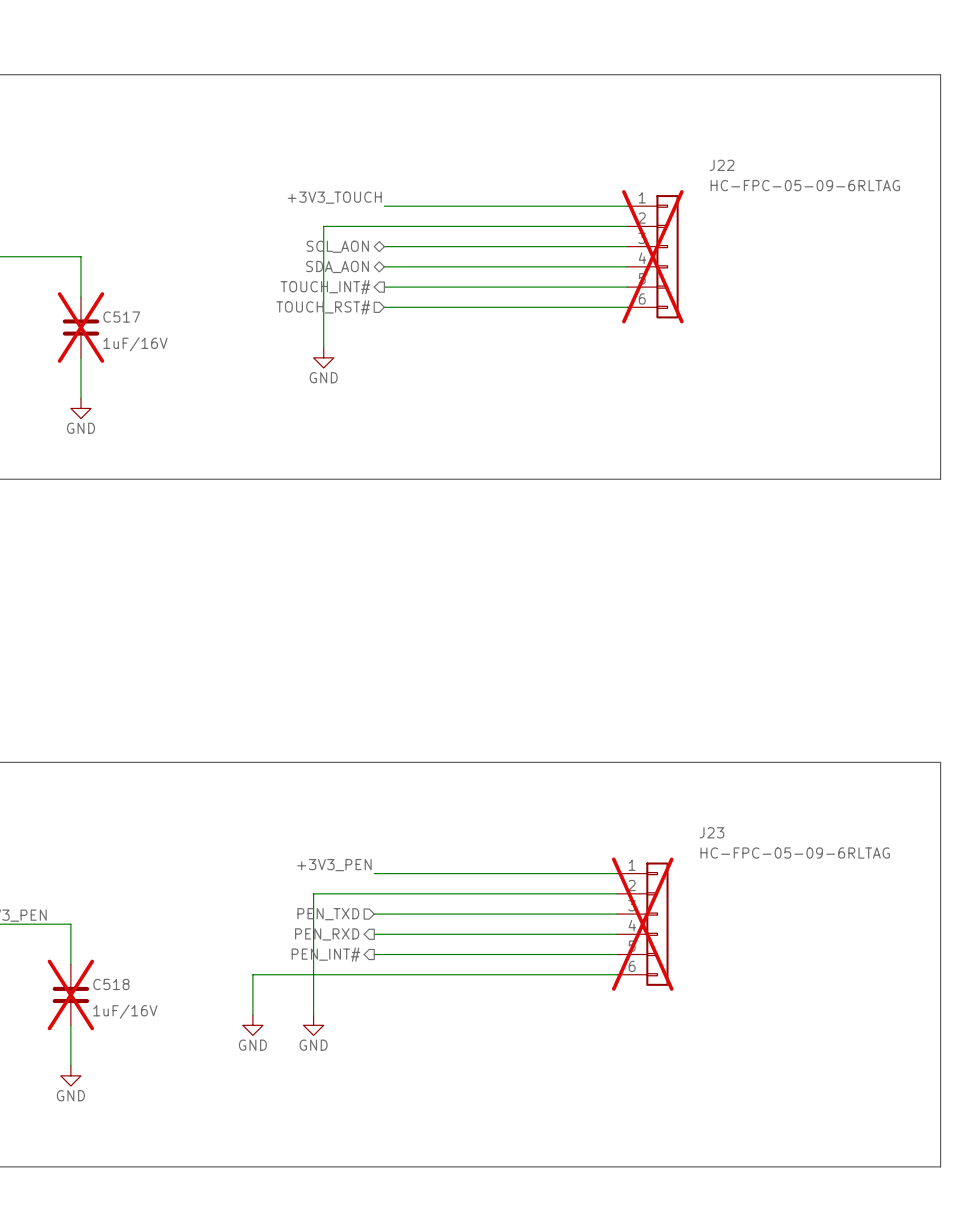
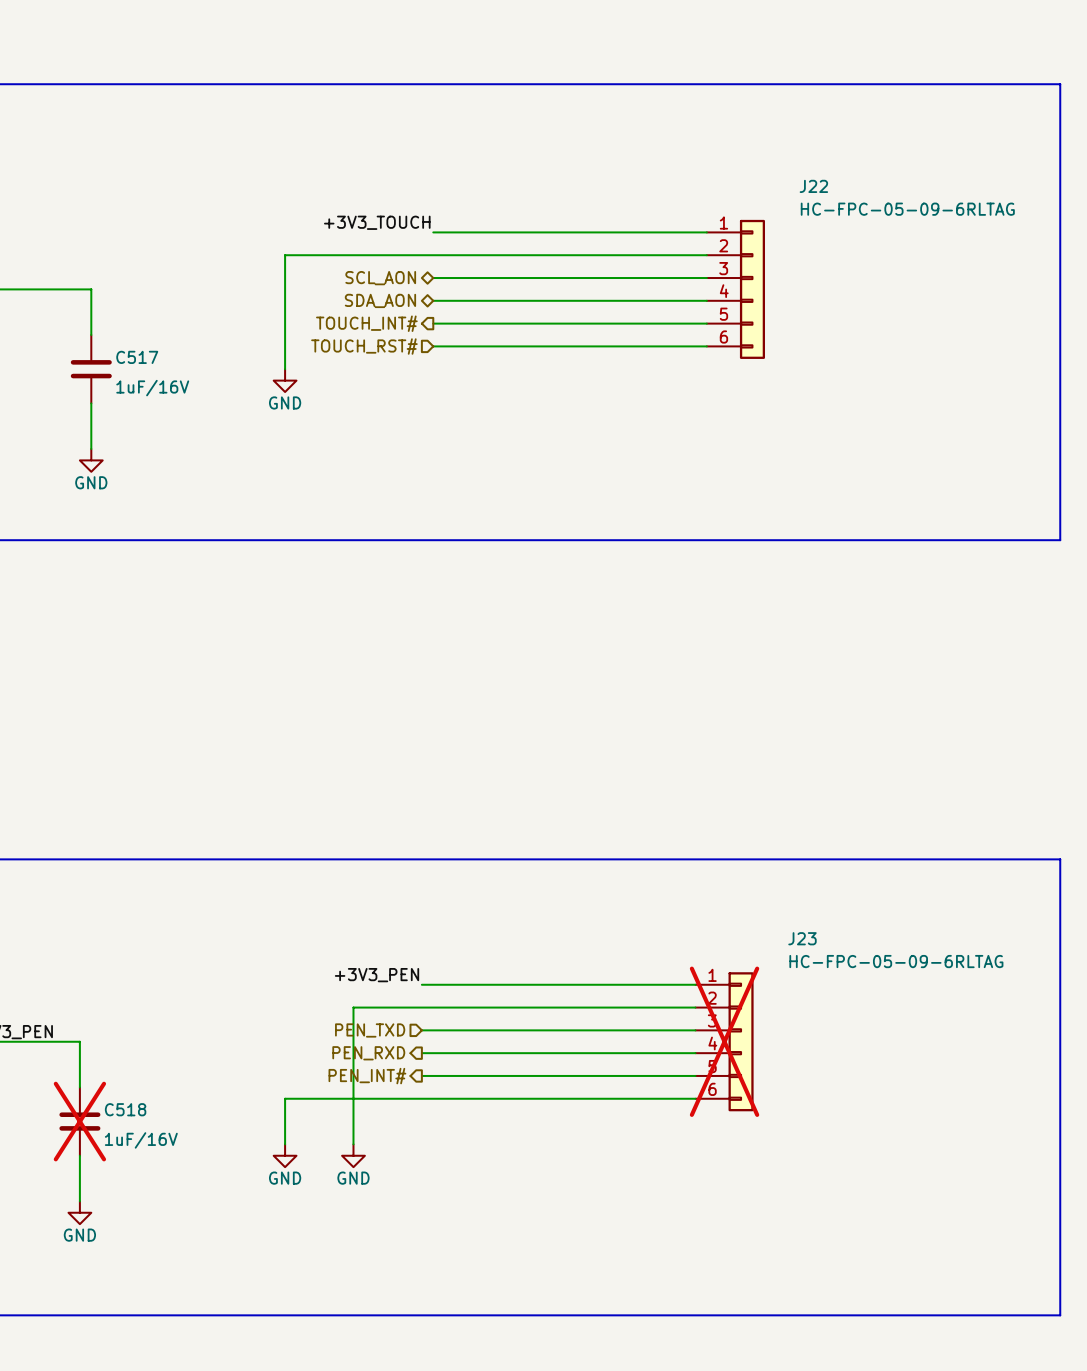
wire: (323, 226) (323, 347) -> (364, 255) (285, 255) (285, 369)
J22 do-not-place cross: (652, 256) -> none
C517 do-not-place cross: (81, 327) -> none
power symbol position: GND (323, 357) -> GND (285, 380)

